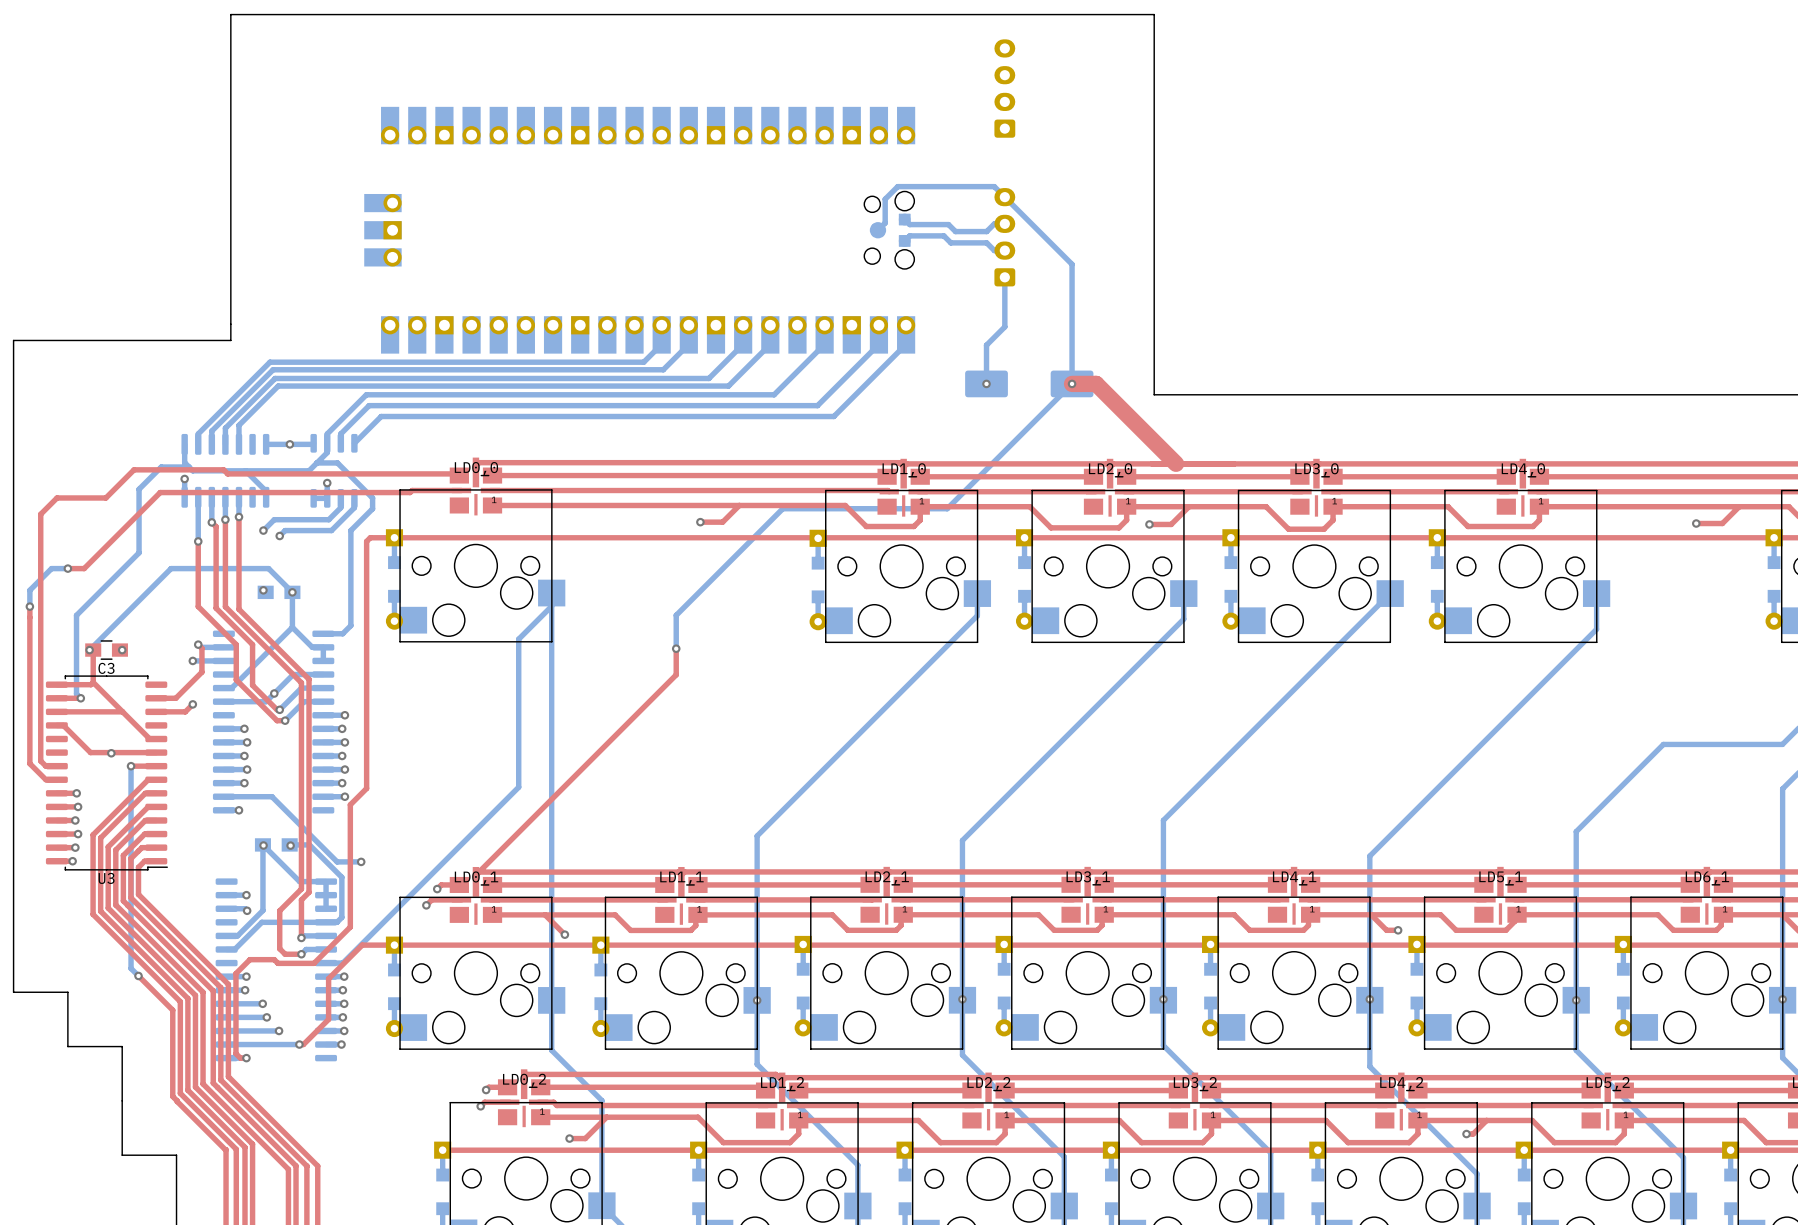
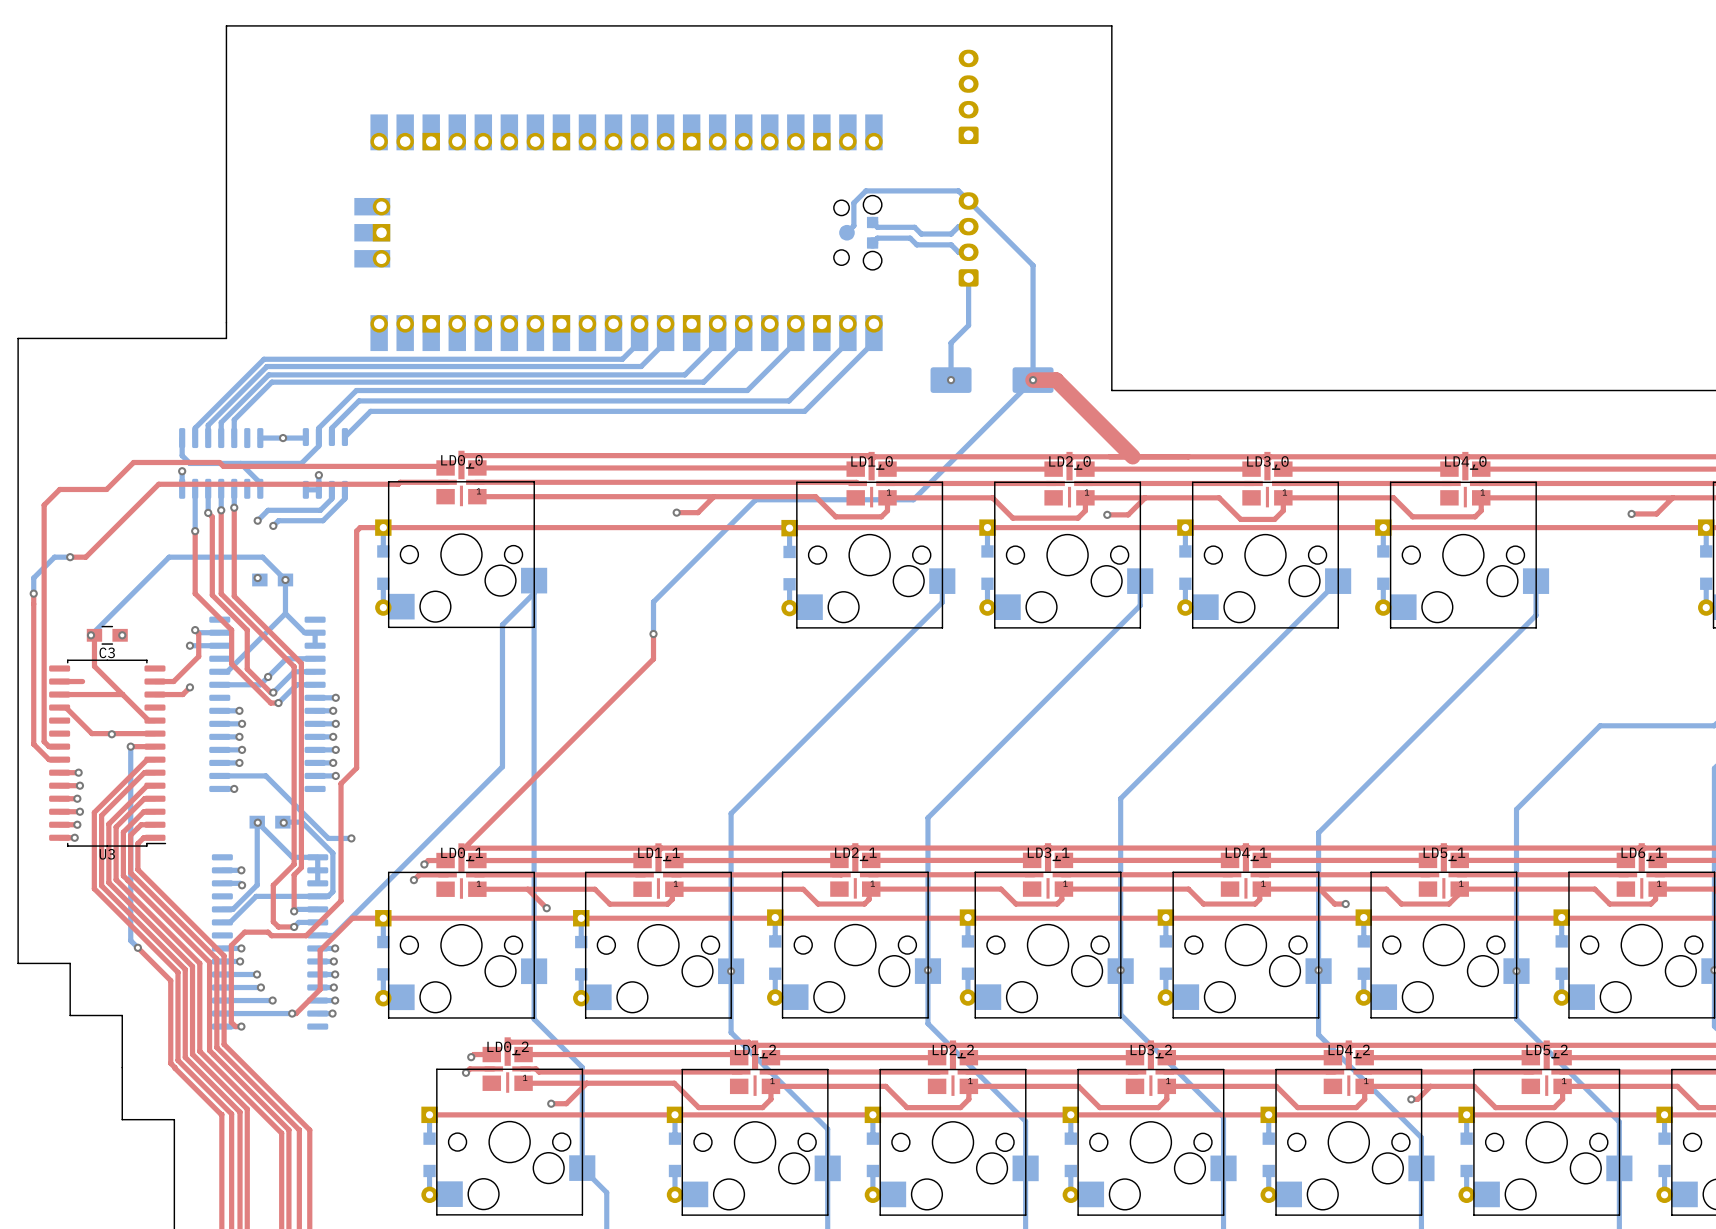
bottom track: (316, 462) (337, 462) (372, 498) (372, 508) (350, 530) (350, 625) (342, 633) (323, 633) -> none
bottom track: (189, 467) (161, 467) (139, 489) (139, 552) (76, 615) (76, 694) (80, 698) -> none
top track: (93, 682) (90, 684) (56, 684) -> none
via: (80, 698) -> none

